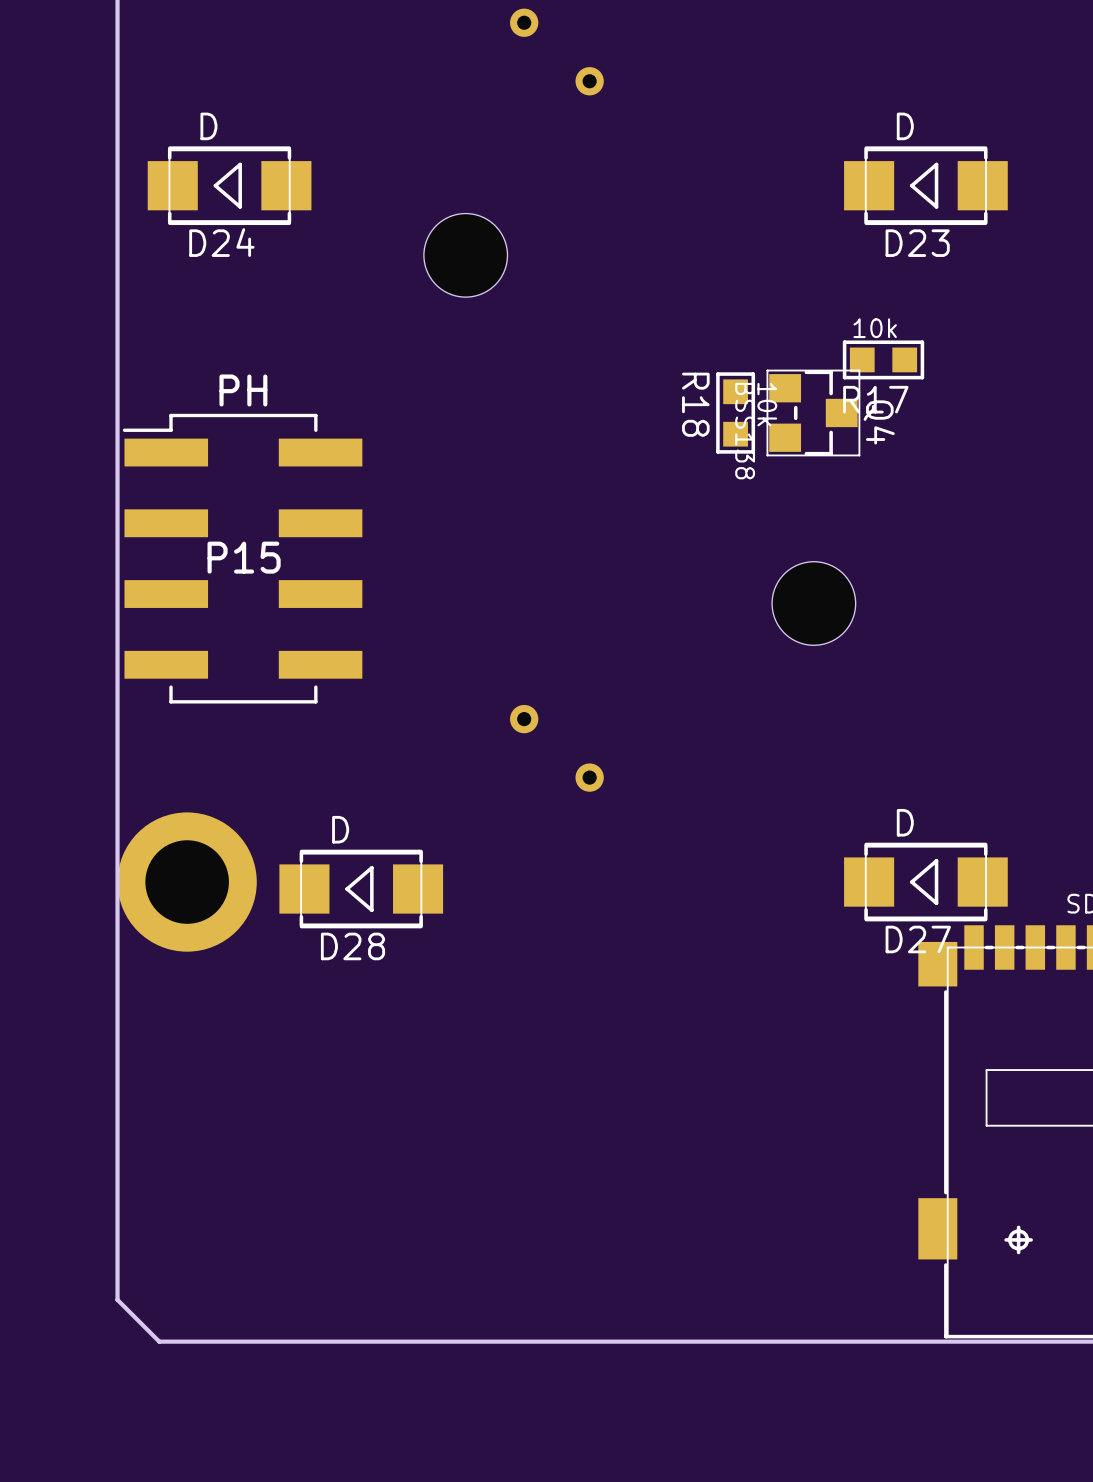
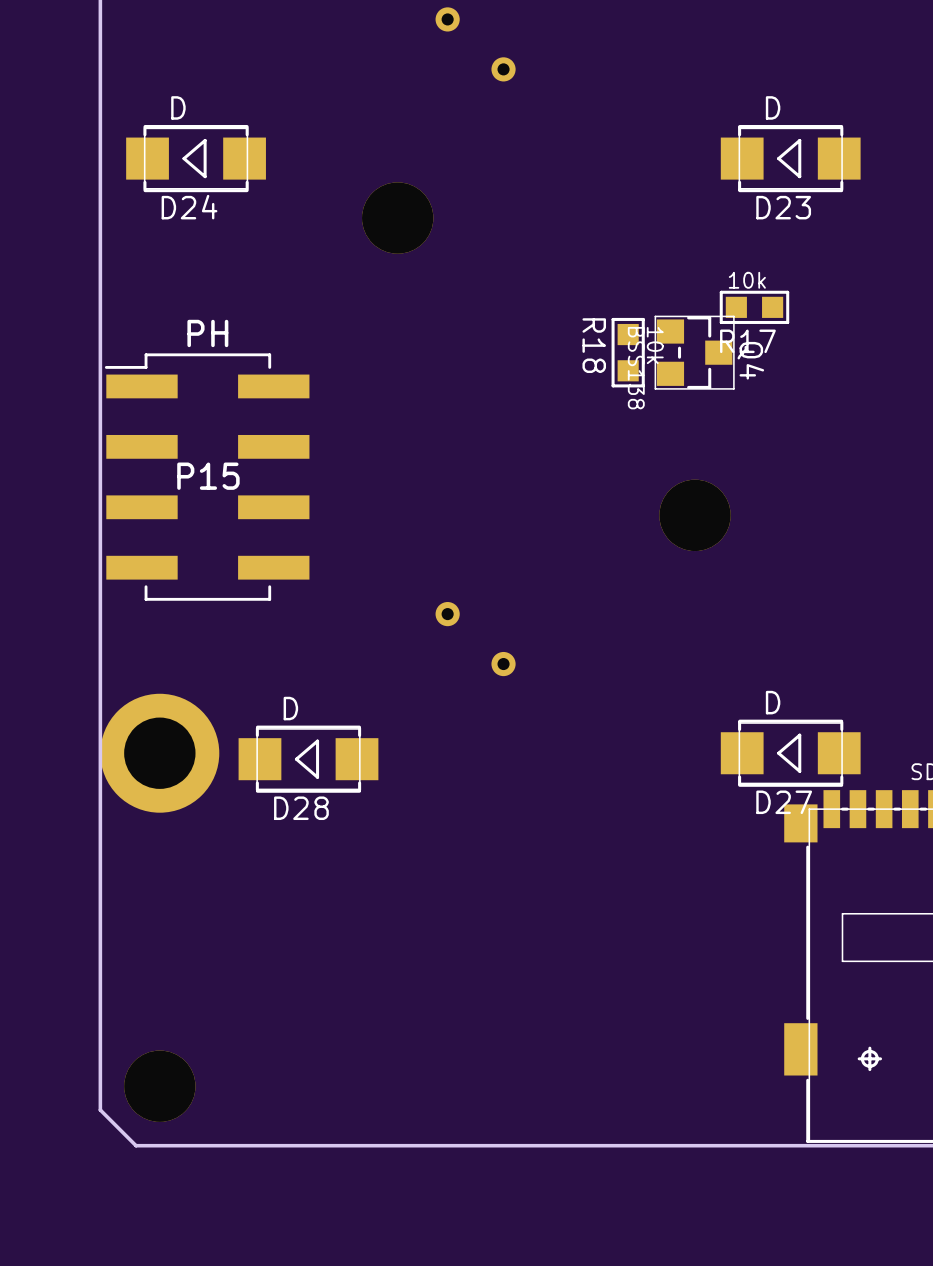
part footprint: [423, 213, 508, 298] -> [362, 182, 434, 254]
part footprint: [772, 561, 856, 646] -> [659, 479, 731, 552]
part: none -> (159, 1086)

